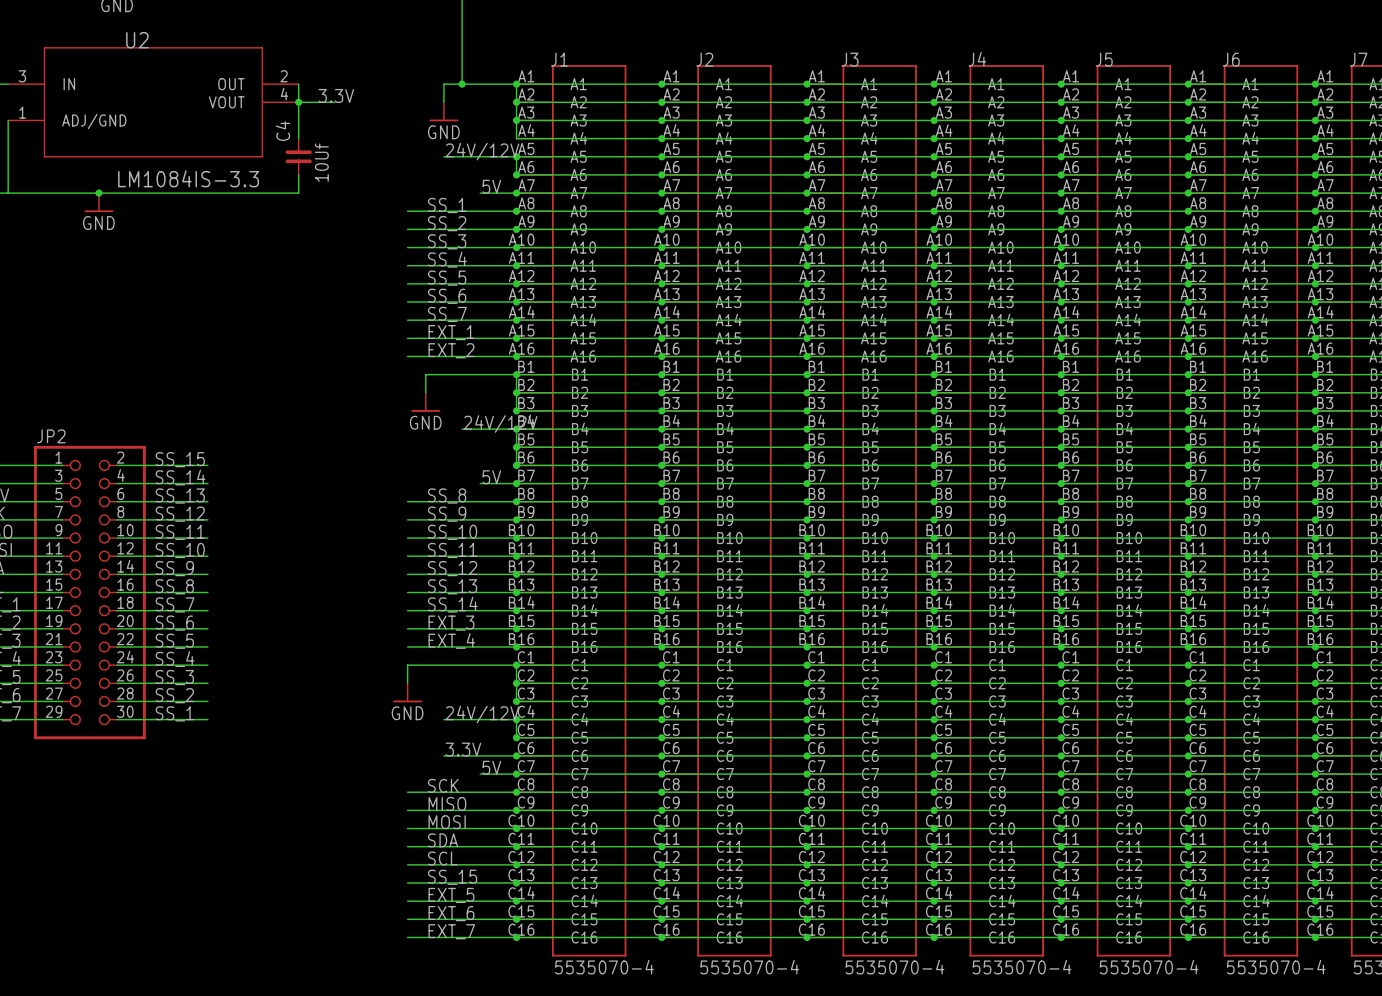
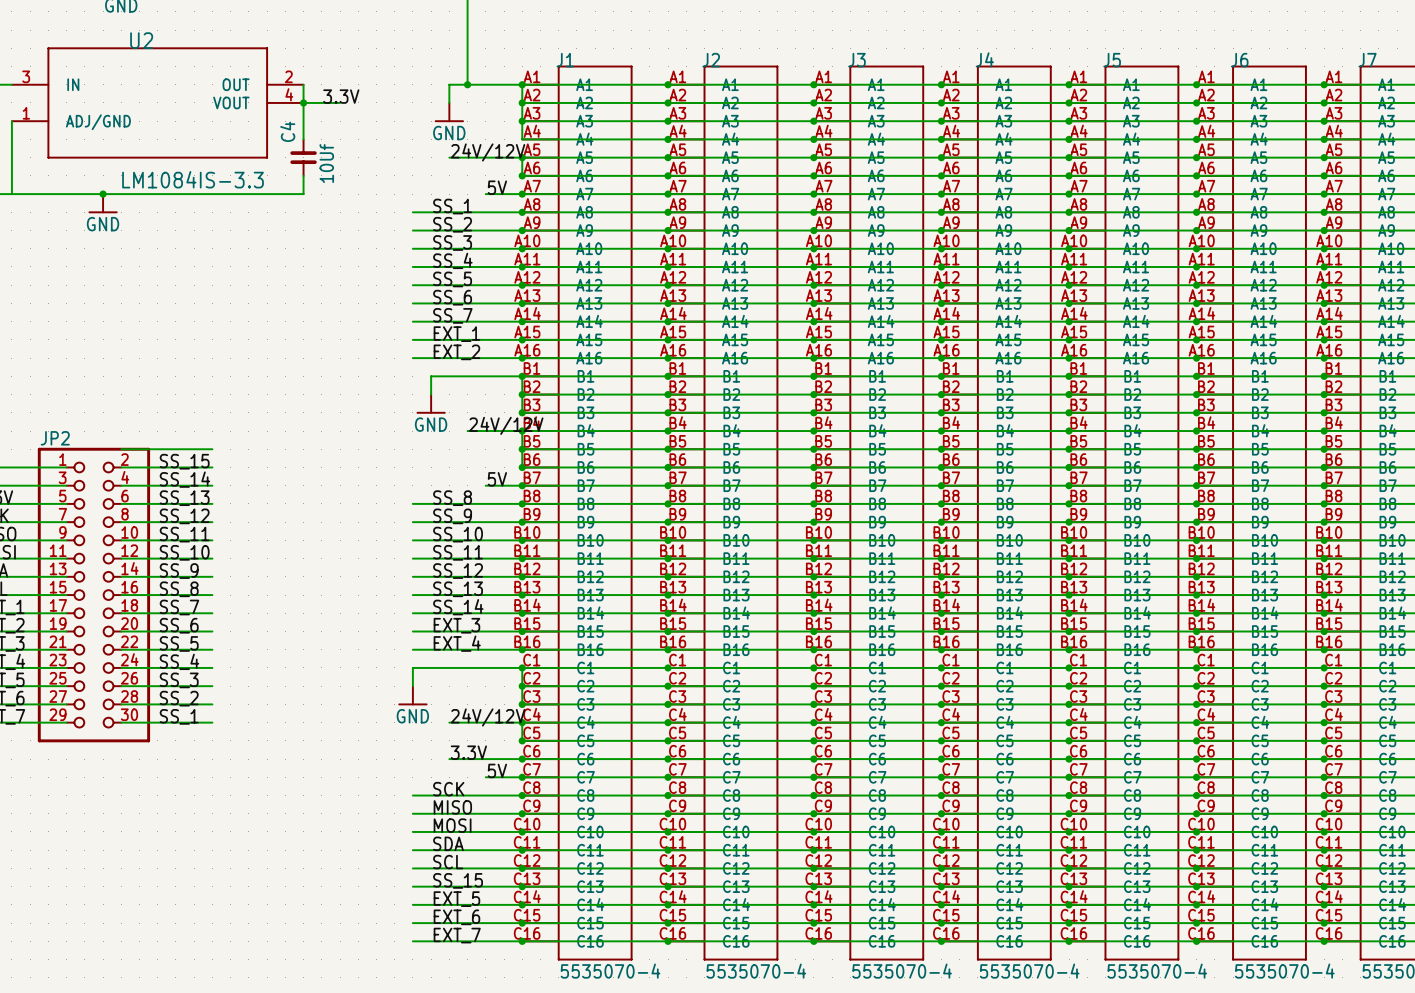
wire: none -> (121, 449) (212, 449)

